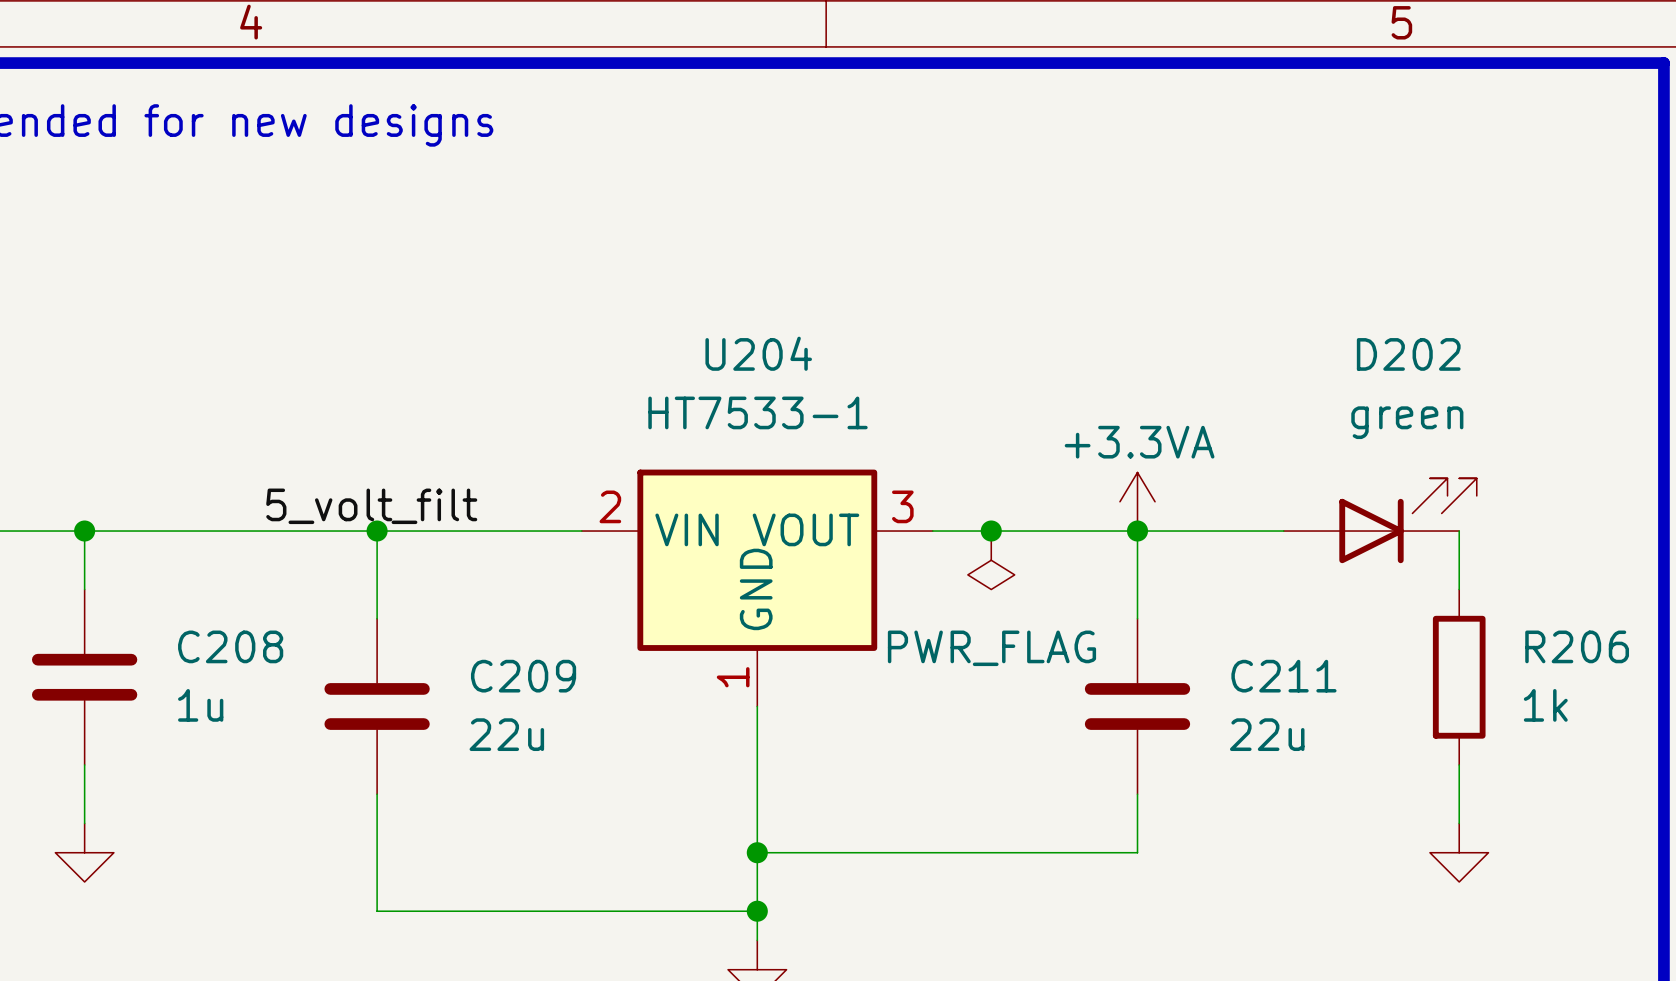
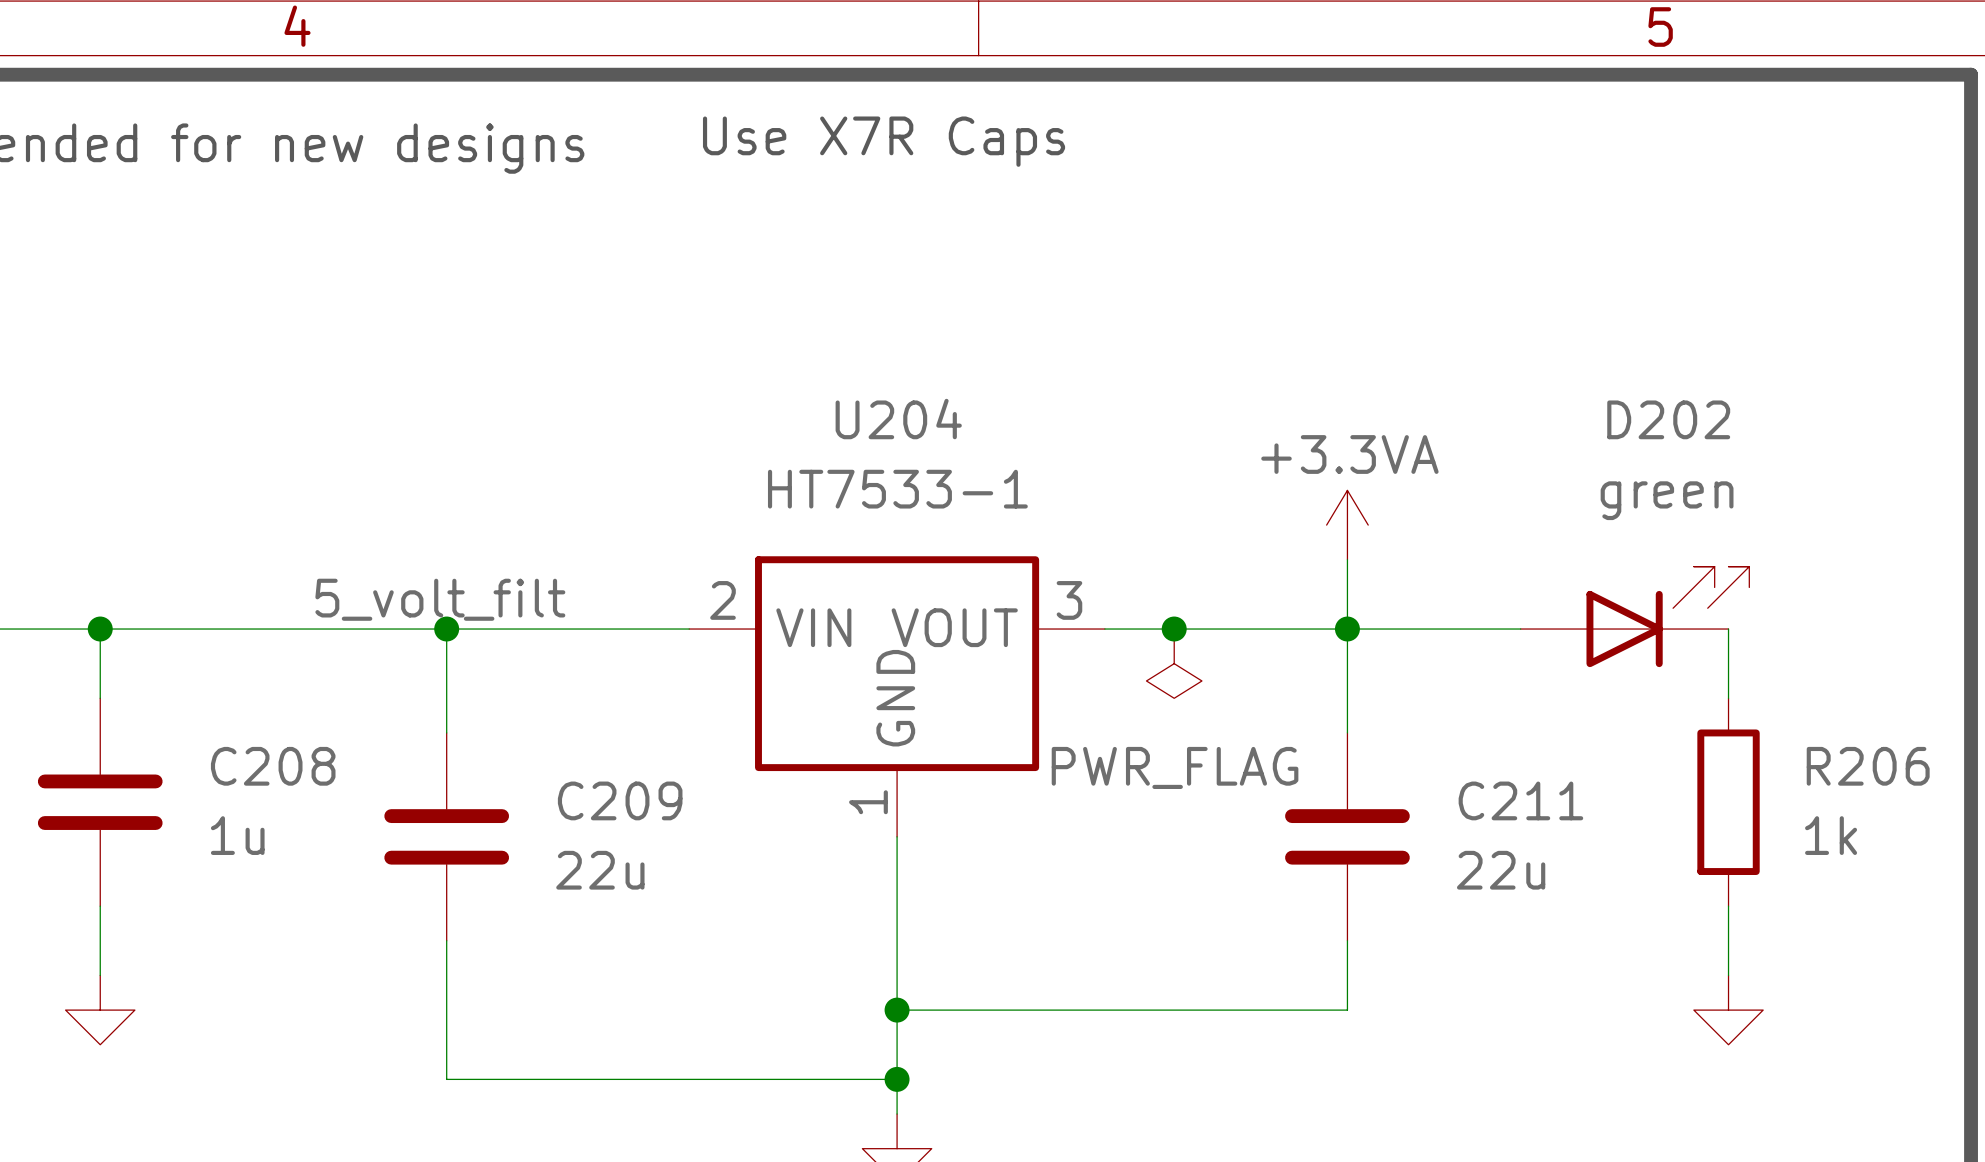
text: none -> Use X7R Caps (884, 141)
power symbol position: +3.3VA (1137, 501) -> +3.3VA (1347, 525)

